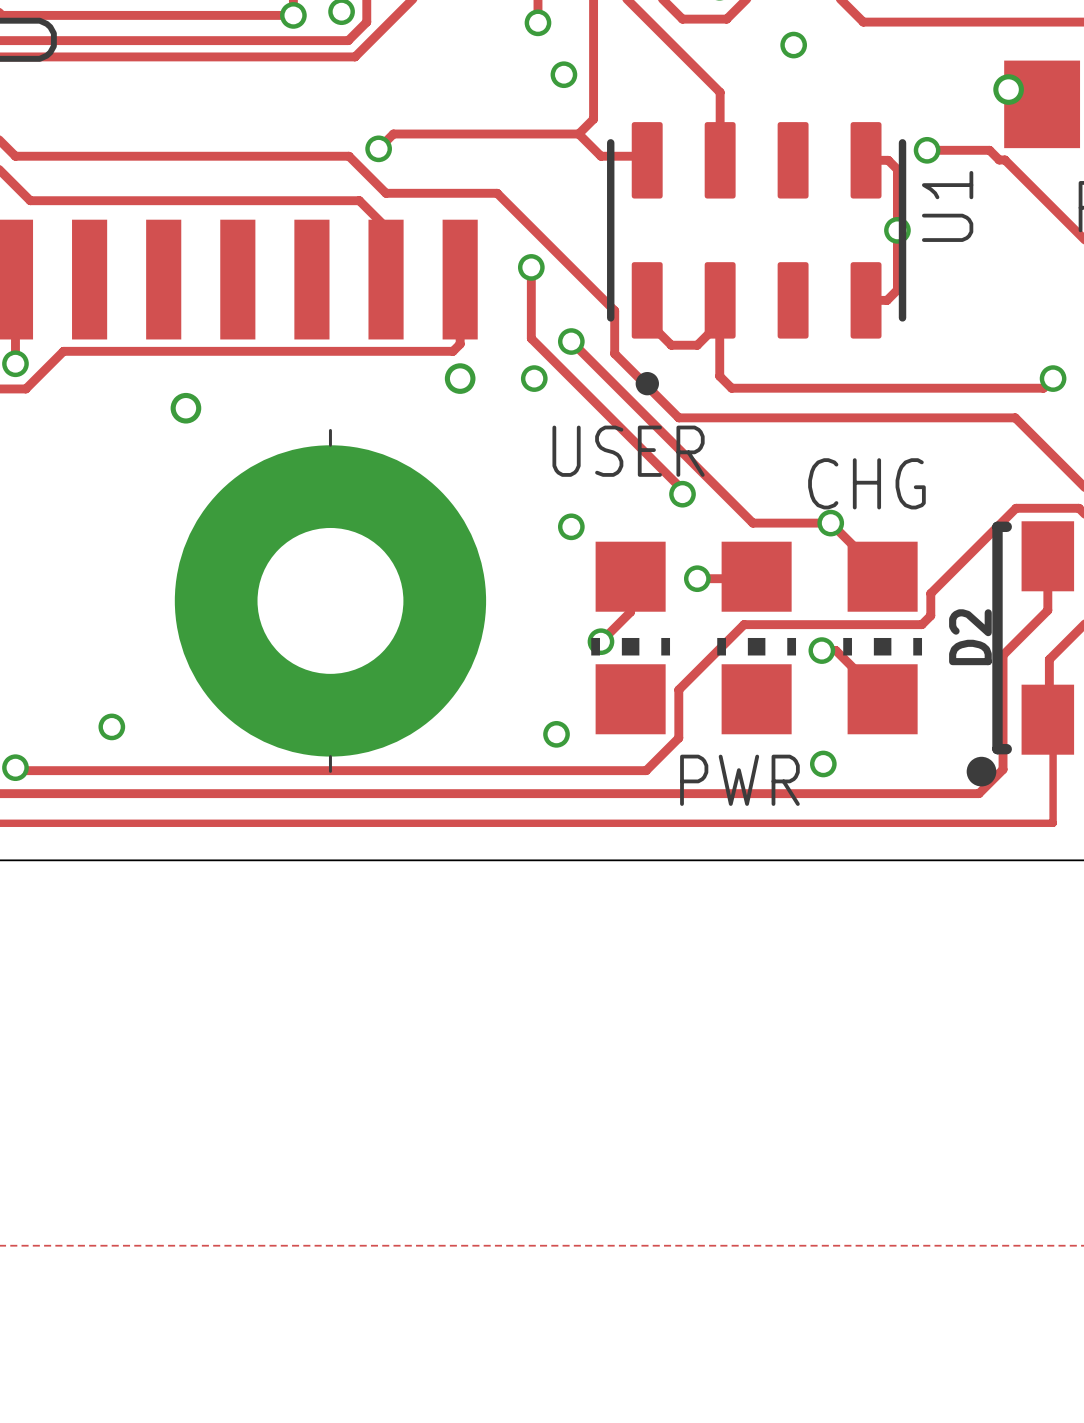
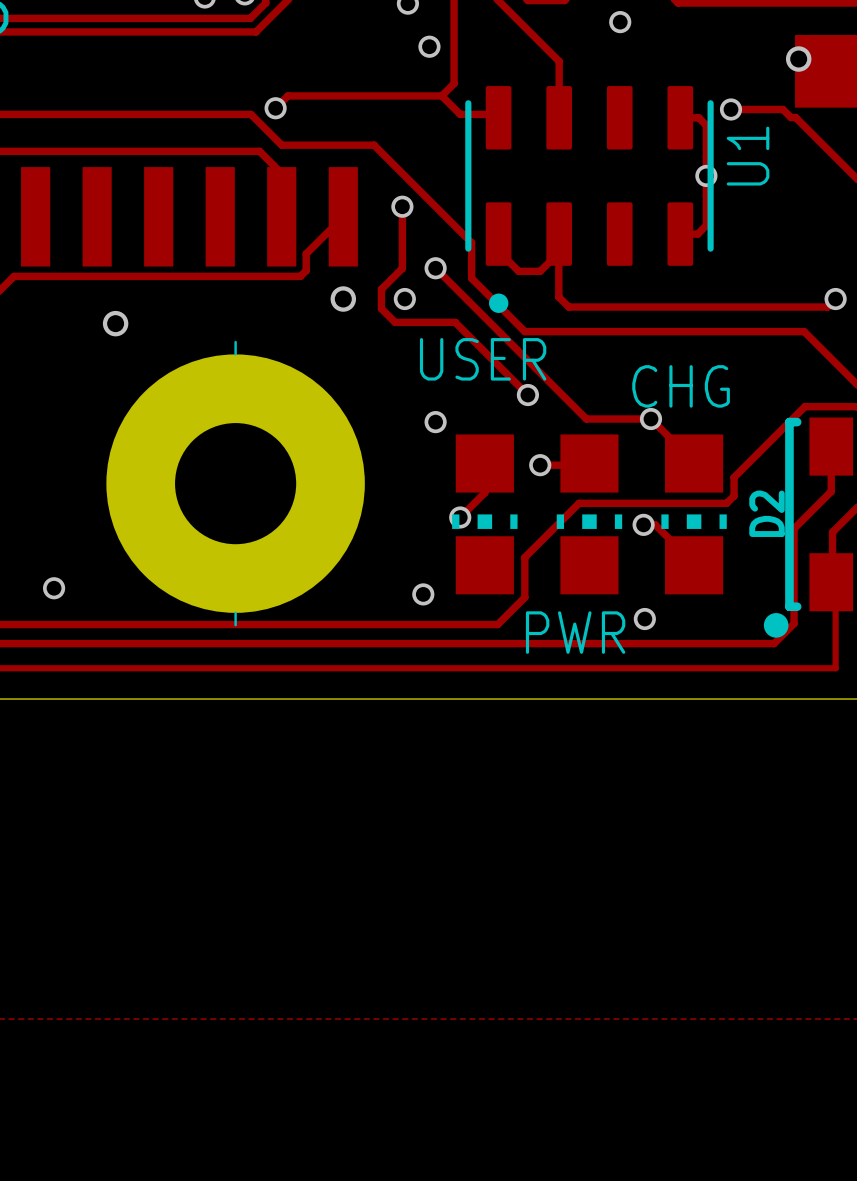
track: (460, 279) (460, 344) (452, 351) (408, 351) -> (343, 216) (306, 253) (306, 270) (300, 276)
track: (531, 338) (682, 489) (682, 494) -> (402, 265) (402, 268) (381, 289) (381, 308) (395, 322) (455, 322) (527, 395)

